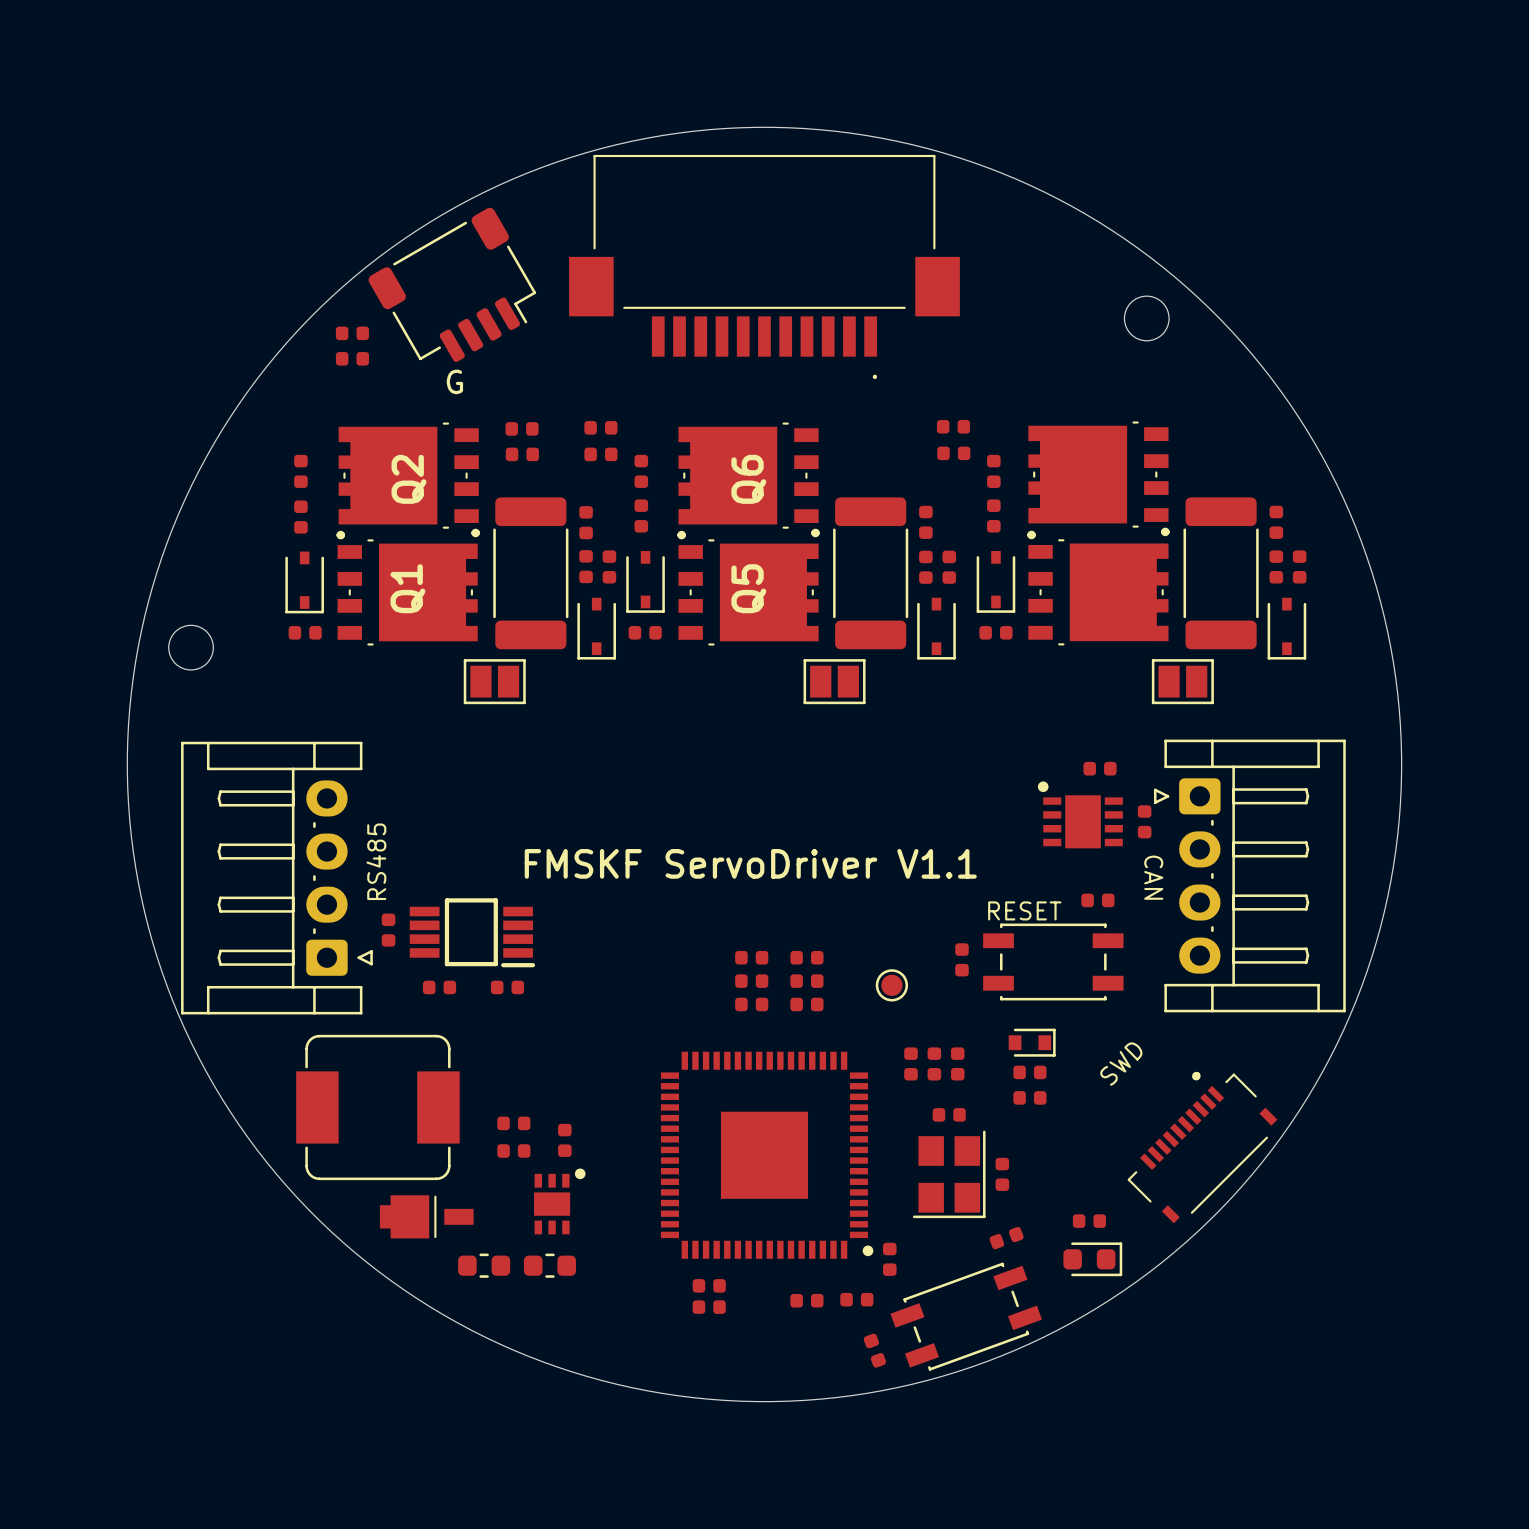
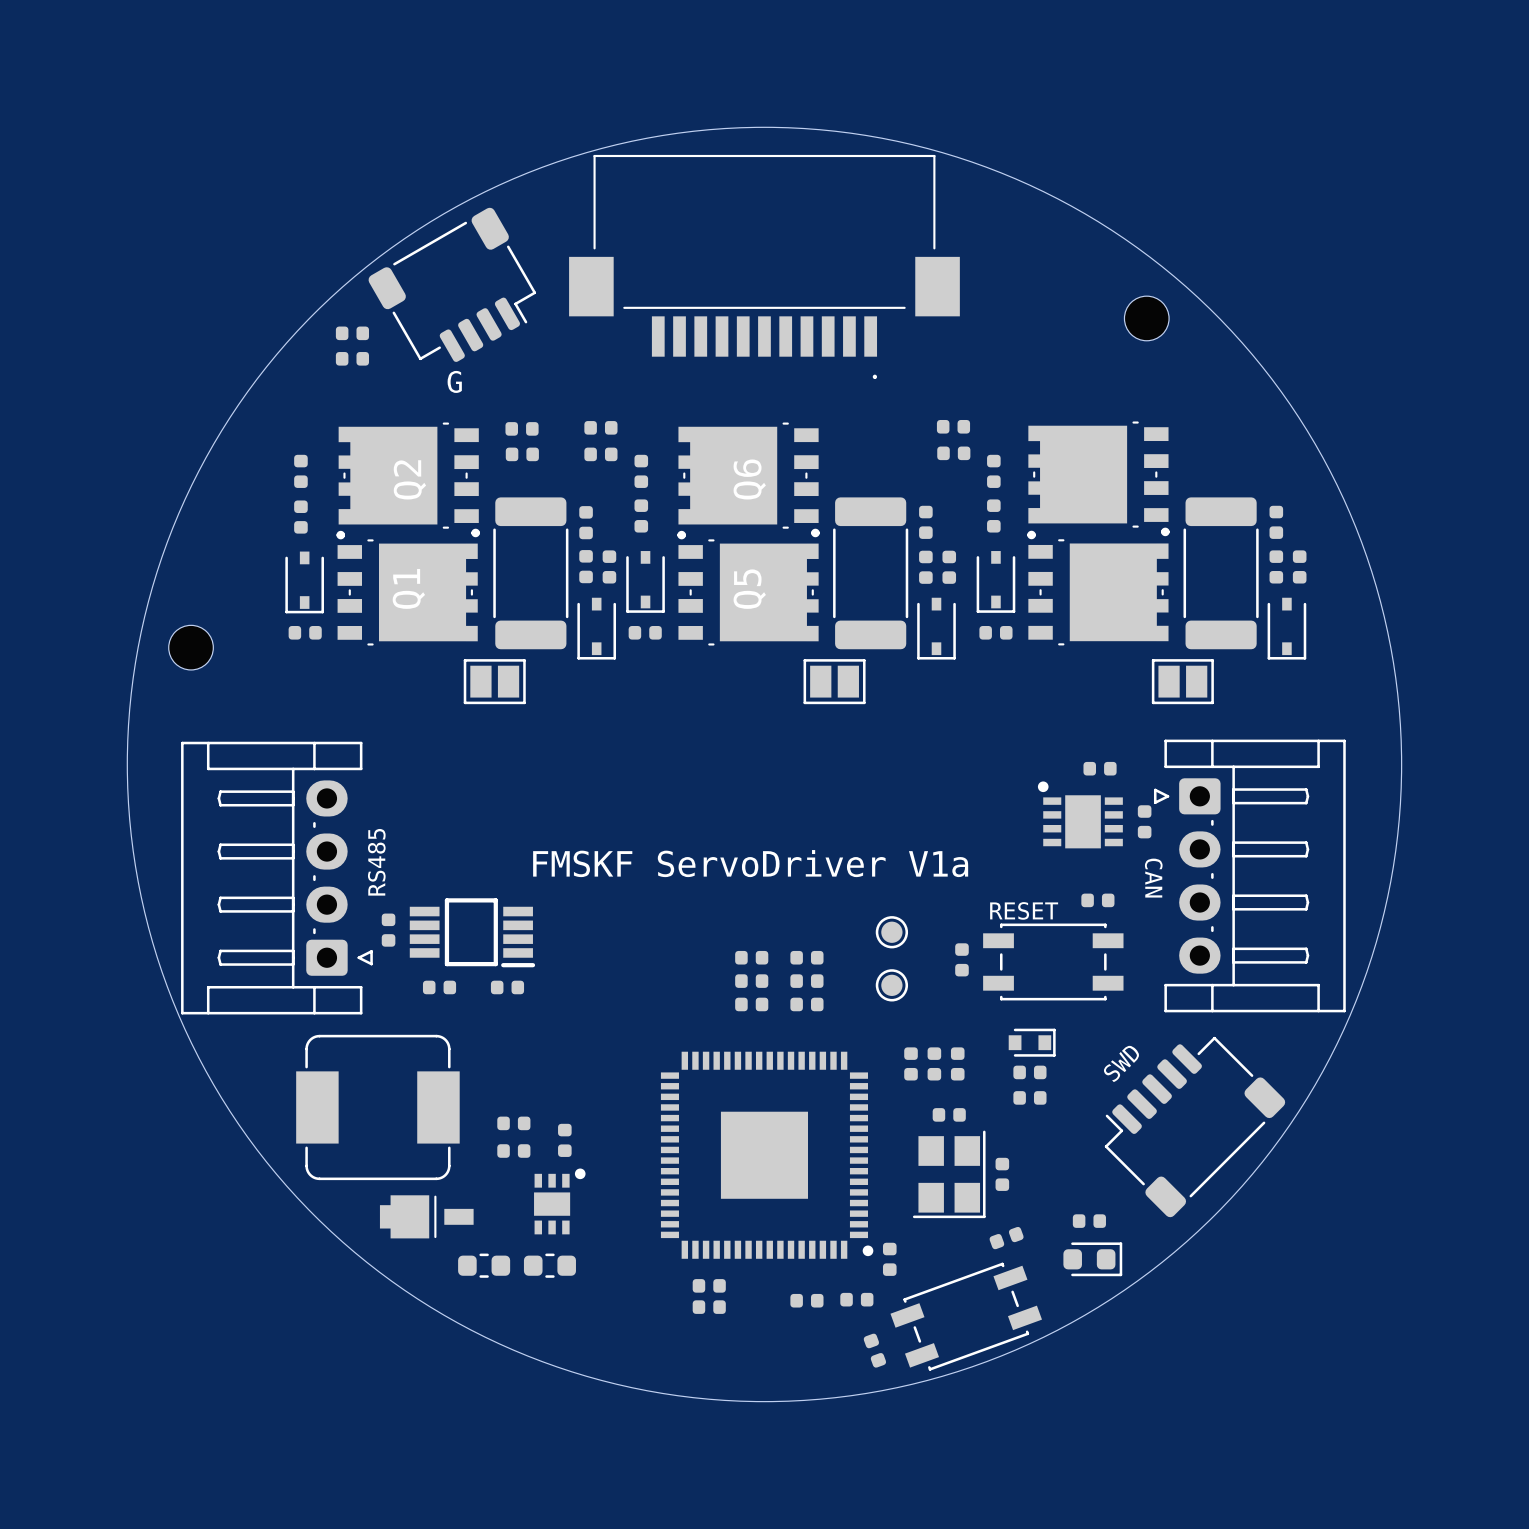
text: FMSKF ServoDriver V1.1 (750, 863) -> FMSKF ServoDriver V1a (750, 863)
part: none -> (891, 932)
part: none -> (1194, 1127)
part: (1202, 1147) -> none

